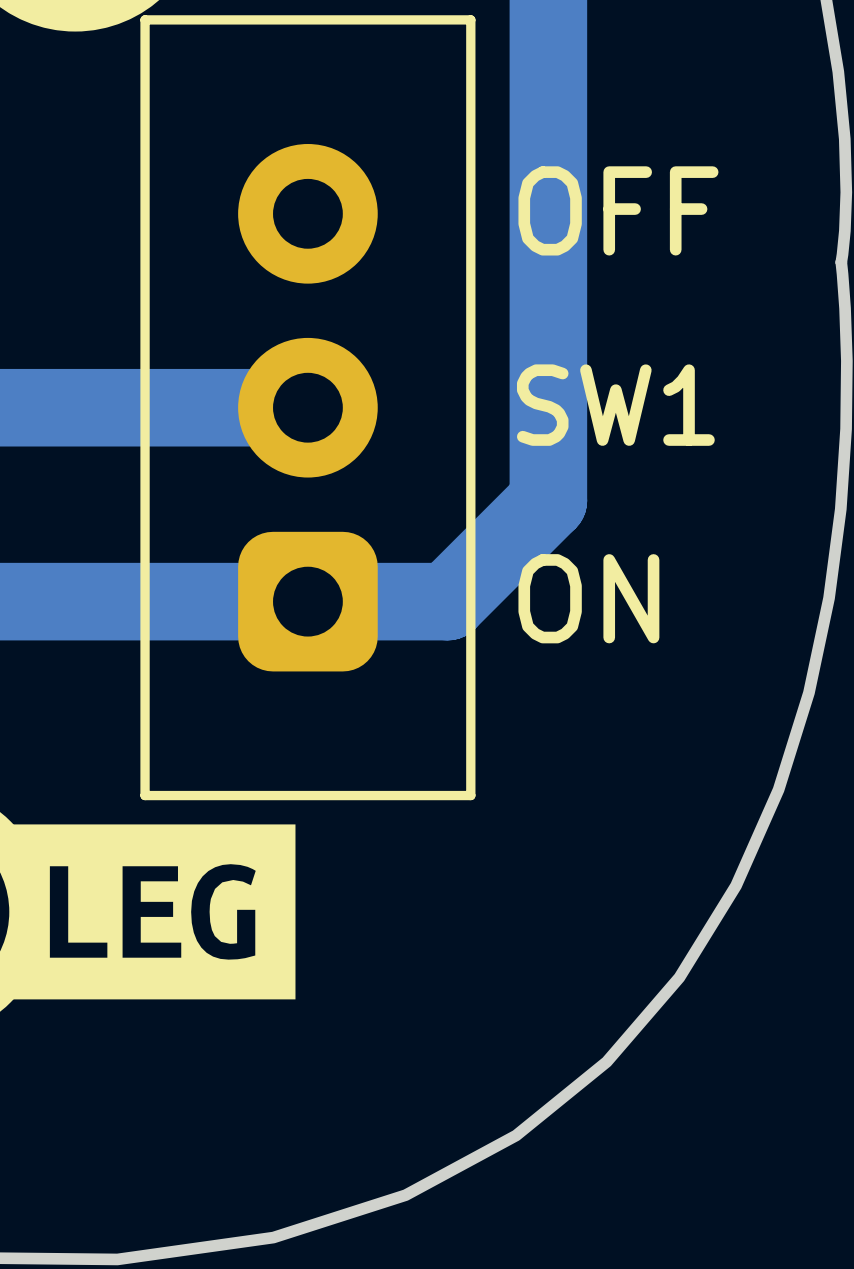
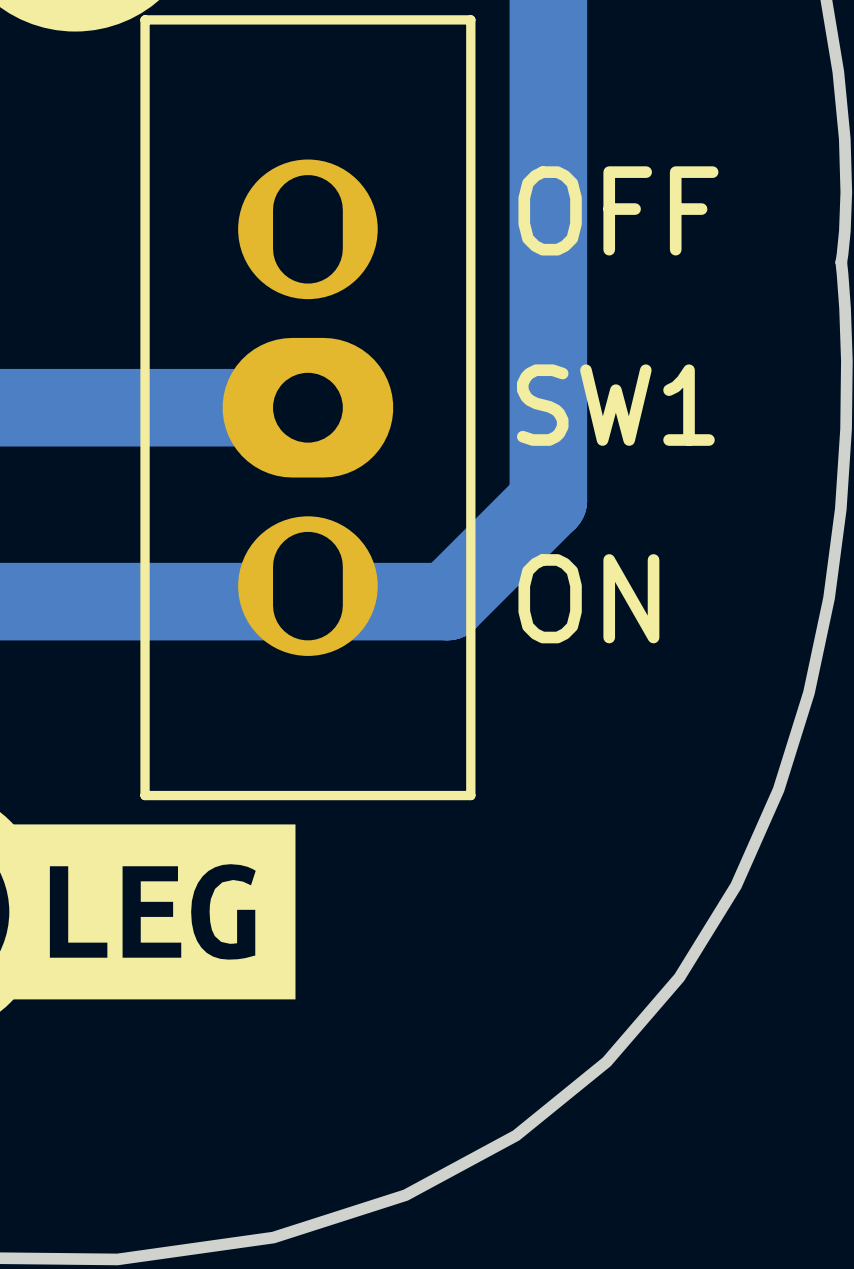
SW1 footprint: [140, 15, 476, 801] -> [140, 15, 476, 801]

